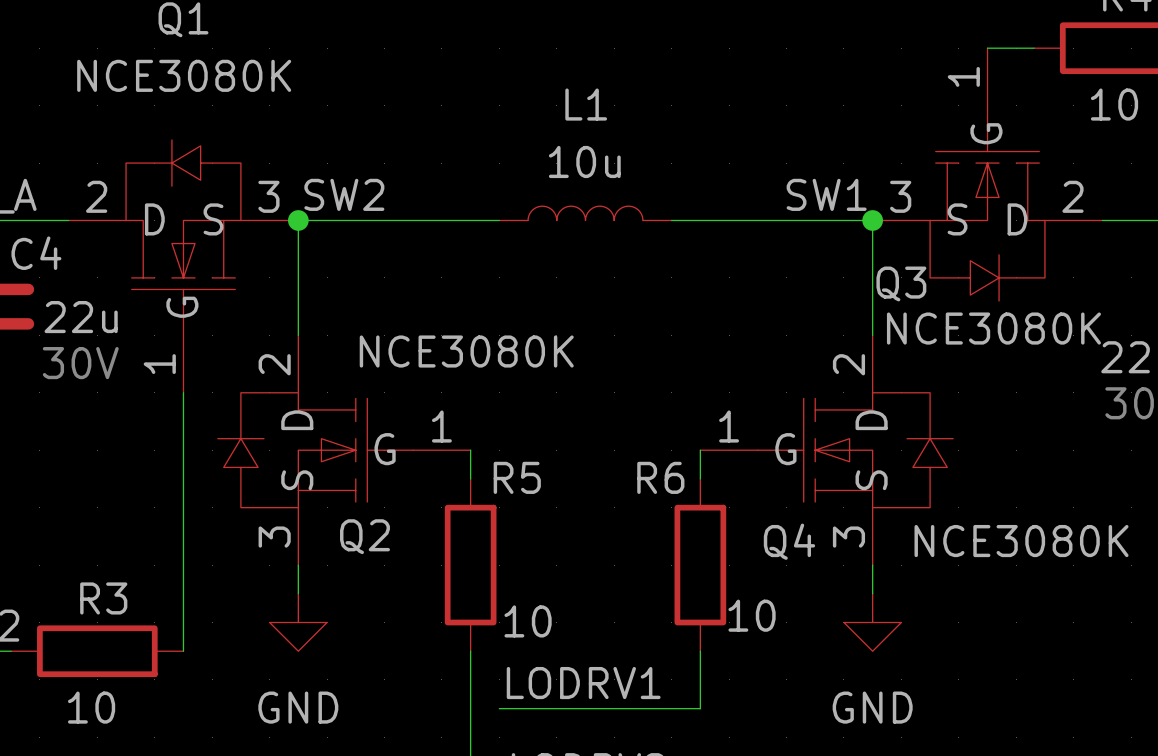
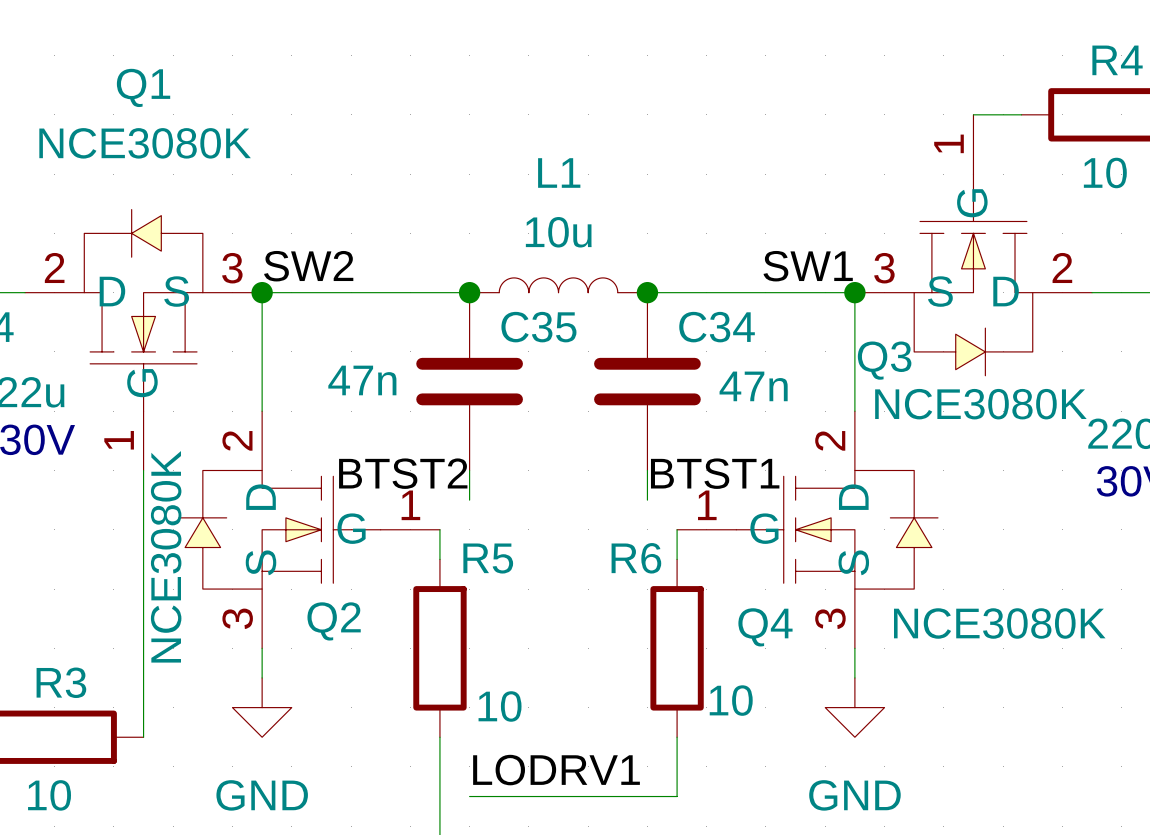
junction: none -> (469, 292)
junction: none -> (647, 292)
C35: none -> 47n (469, 381)
C34: none -> 47n (647, 381)
Q2 value rotation: 0° (466, 351) -> 90° counterclockwise (166, 556)
Q2 value position: NCE3080K (466, 351) -> NCE3080K (166, 556)
wire: none -> (469, 470) (469, 500)
wire: none -> (647, 470) (647, 500)
label: none -> BTST2 (403, 473)
label: none -> BTST1 (715, 473)

